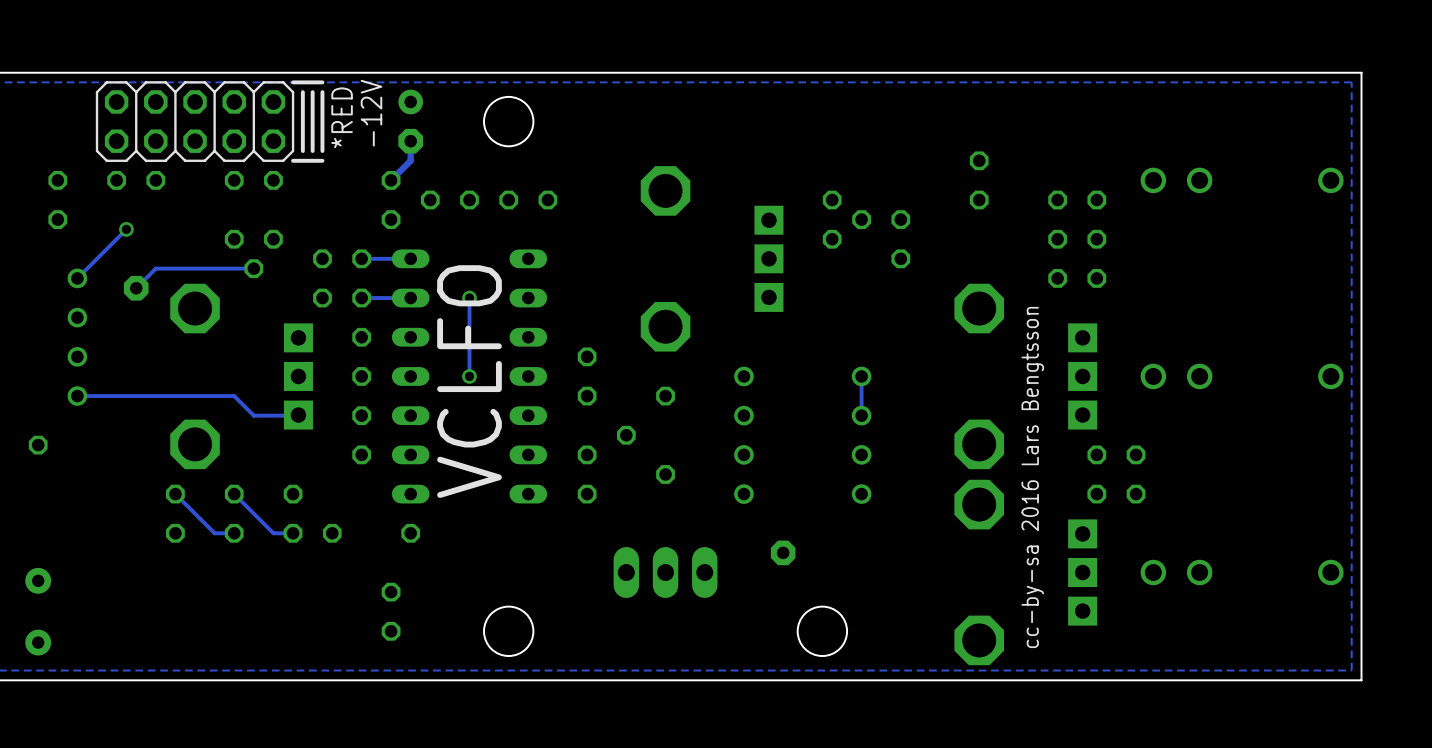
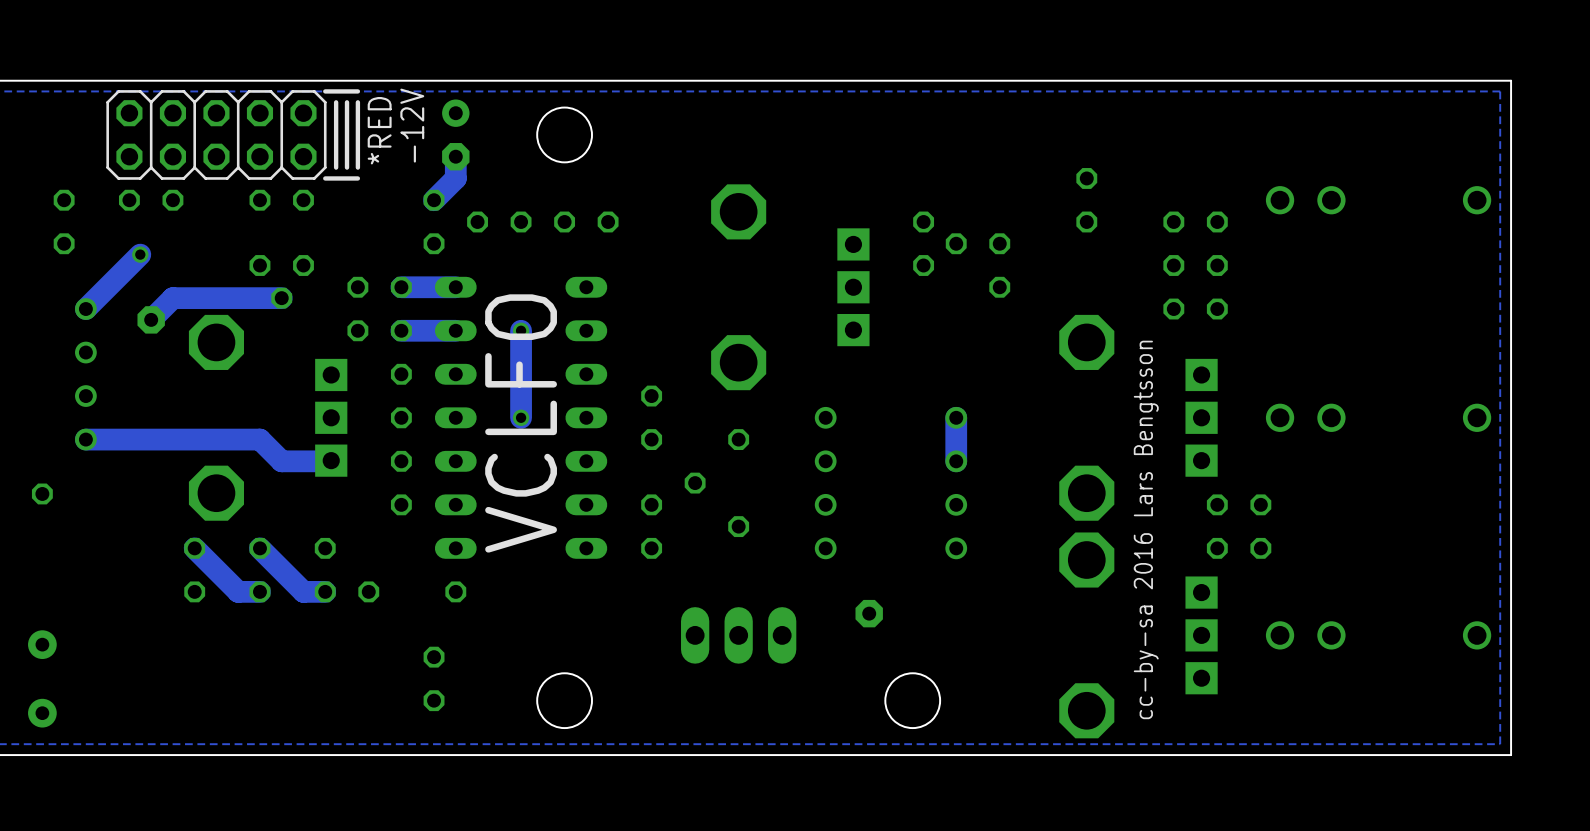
track width: thin (410, 141) (410, 160) (391, 180) -> thick (455, 156) (455, 178) (434, 200)
track width: thin (126, 229) (77, 278) -> thick (140, 254) (85, 309)
track width: thin (410, 258) (361, 258) -> thick (455, 287) (401, 287)
track width: thin (253, 268) (155, 268) (136, 288) -> thick (281, 298) (172, 298) (151, 319)
track width: thin (410, 298) (361, 298) -> thick (455, 330) (401, 330)
track width: thin (469, 298) (469, 376) -> thick (521, 330) (521, 417)
track width: thin (861, 376) (861, 415) -> thick (956, 417) (956, 461)
track width: thin (77, 396) (234, 396) (253, 415) (298, 415) -> thick (85, 439) (259, 439) (281, 461) (331, 460)
track width: thin (175, 494) (214, 533) (234, 533) -> thick (194, 548) (238, 591) (259, 591)
track width: thin (234, 494) (273, 533) (293, 533) -> thick (259, 548) (303, 591) (325, 591)

